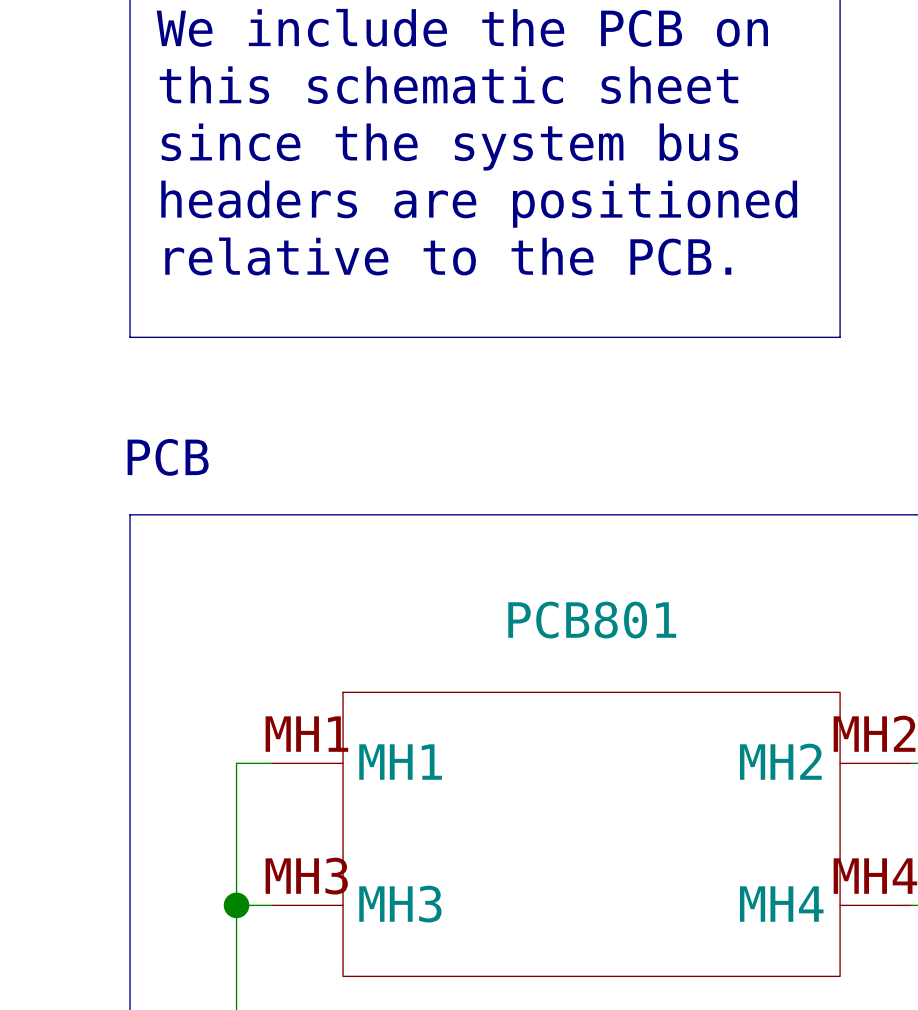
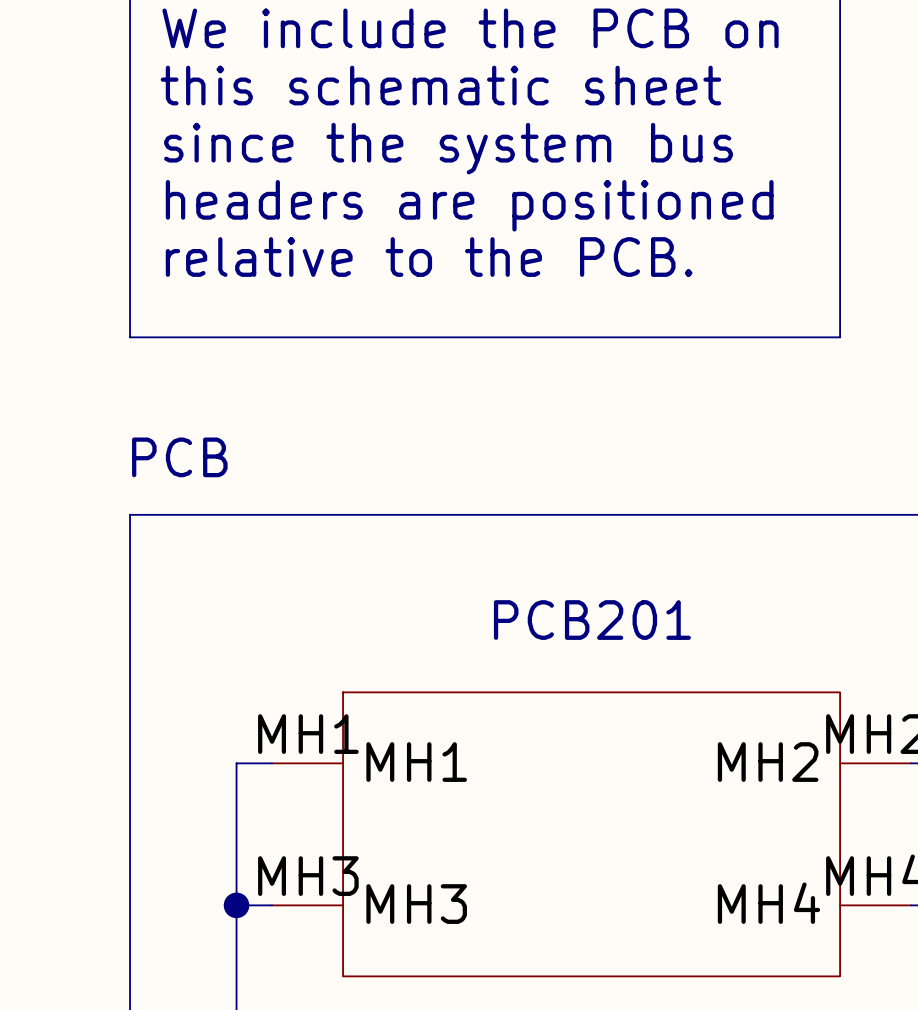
PCB801 name: PCB801 (592, 620) -> PCB201 (592, 620)

